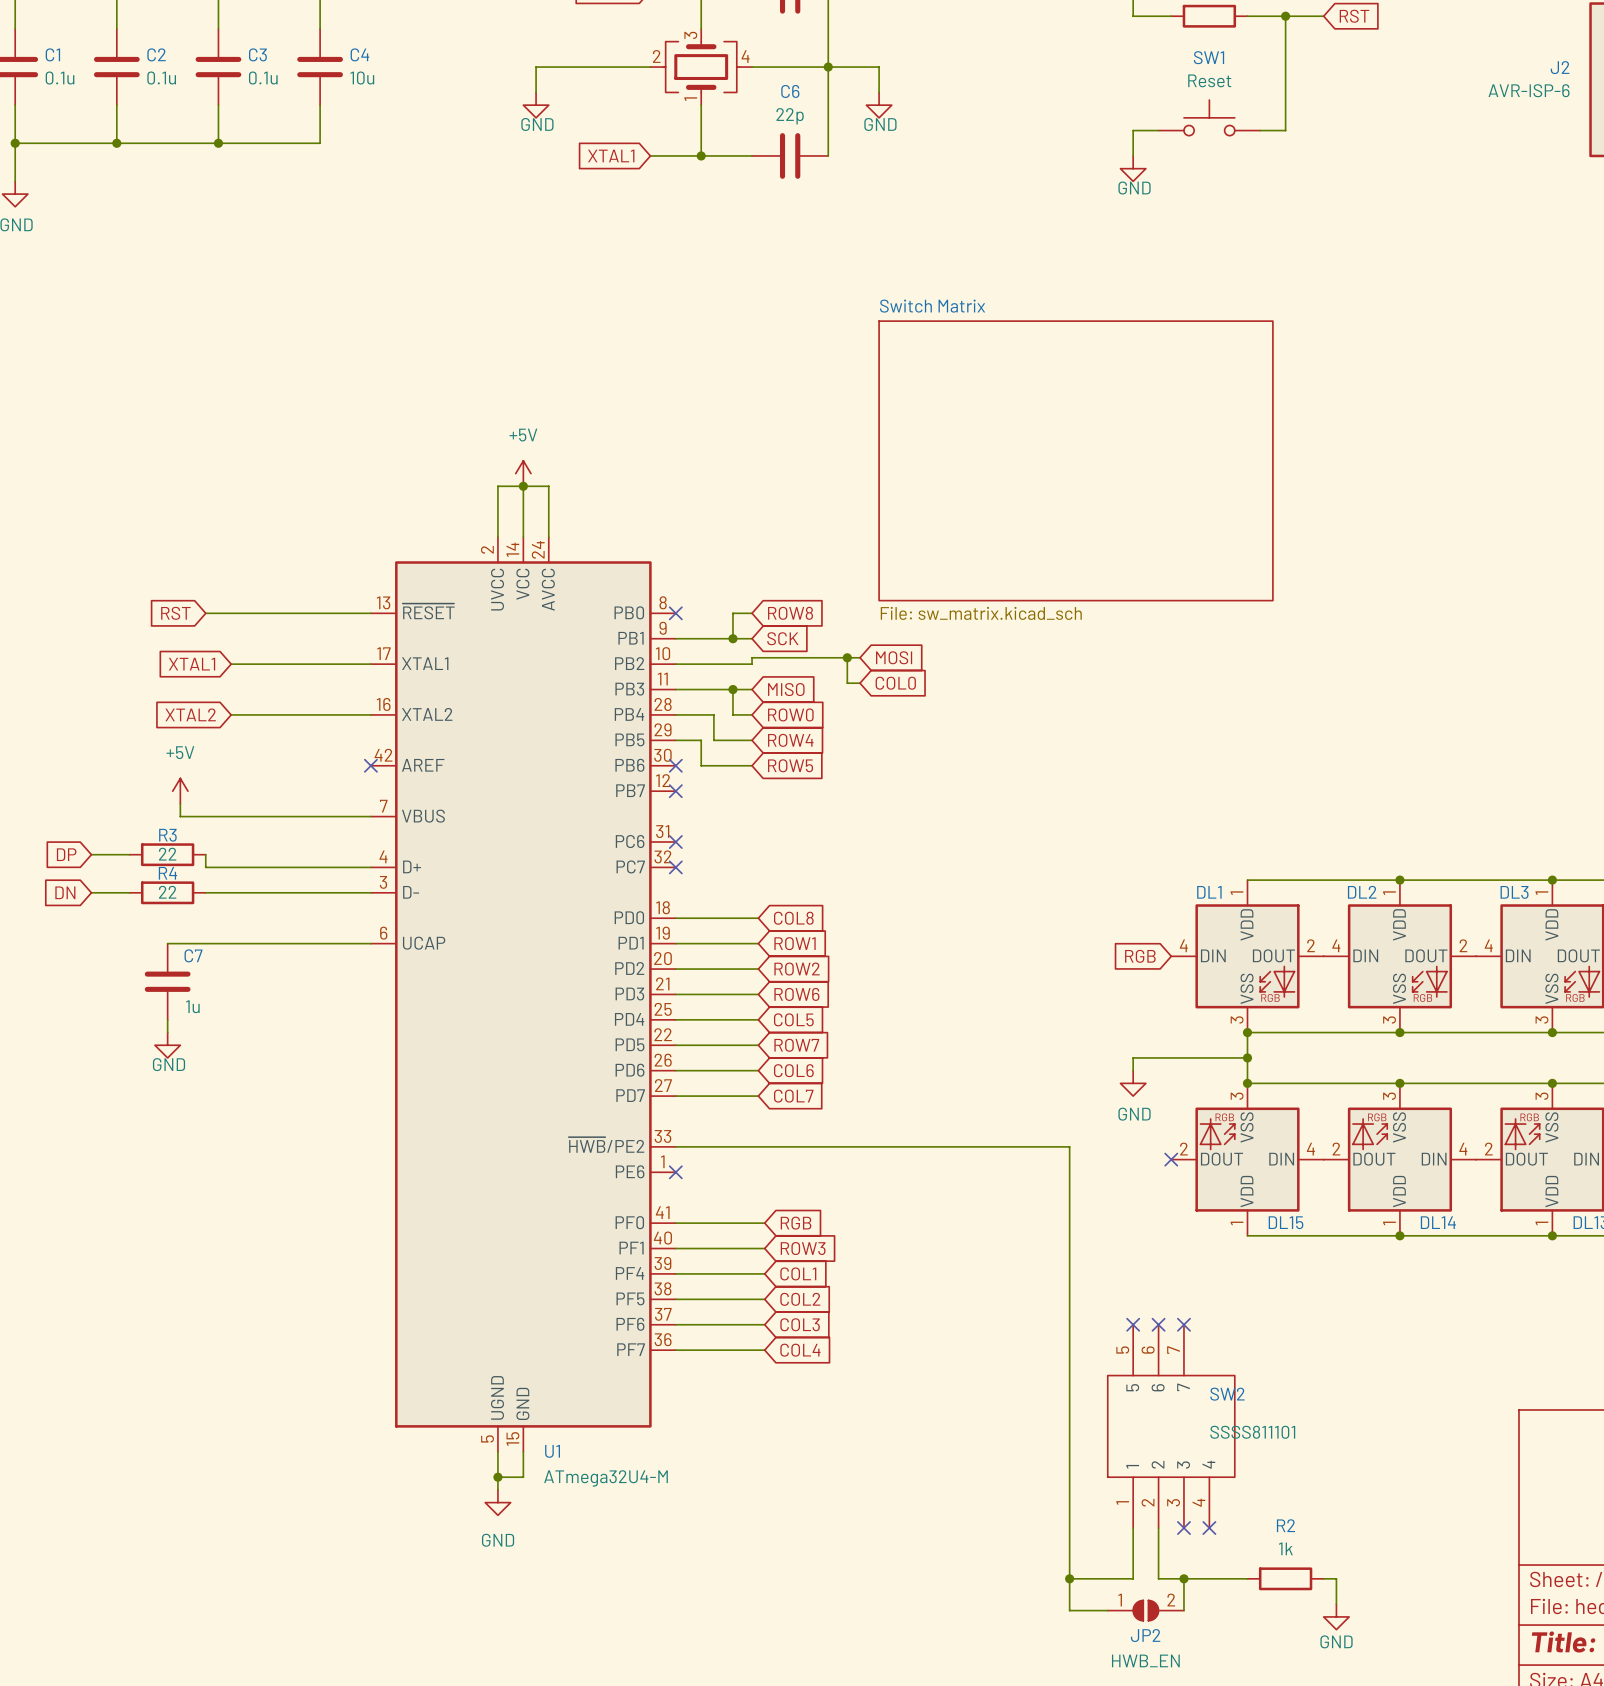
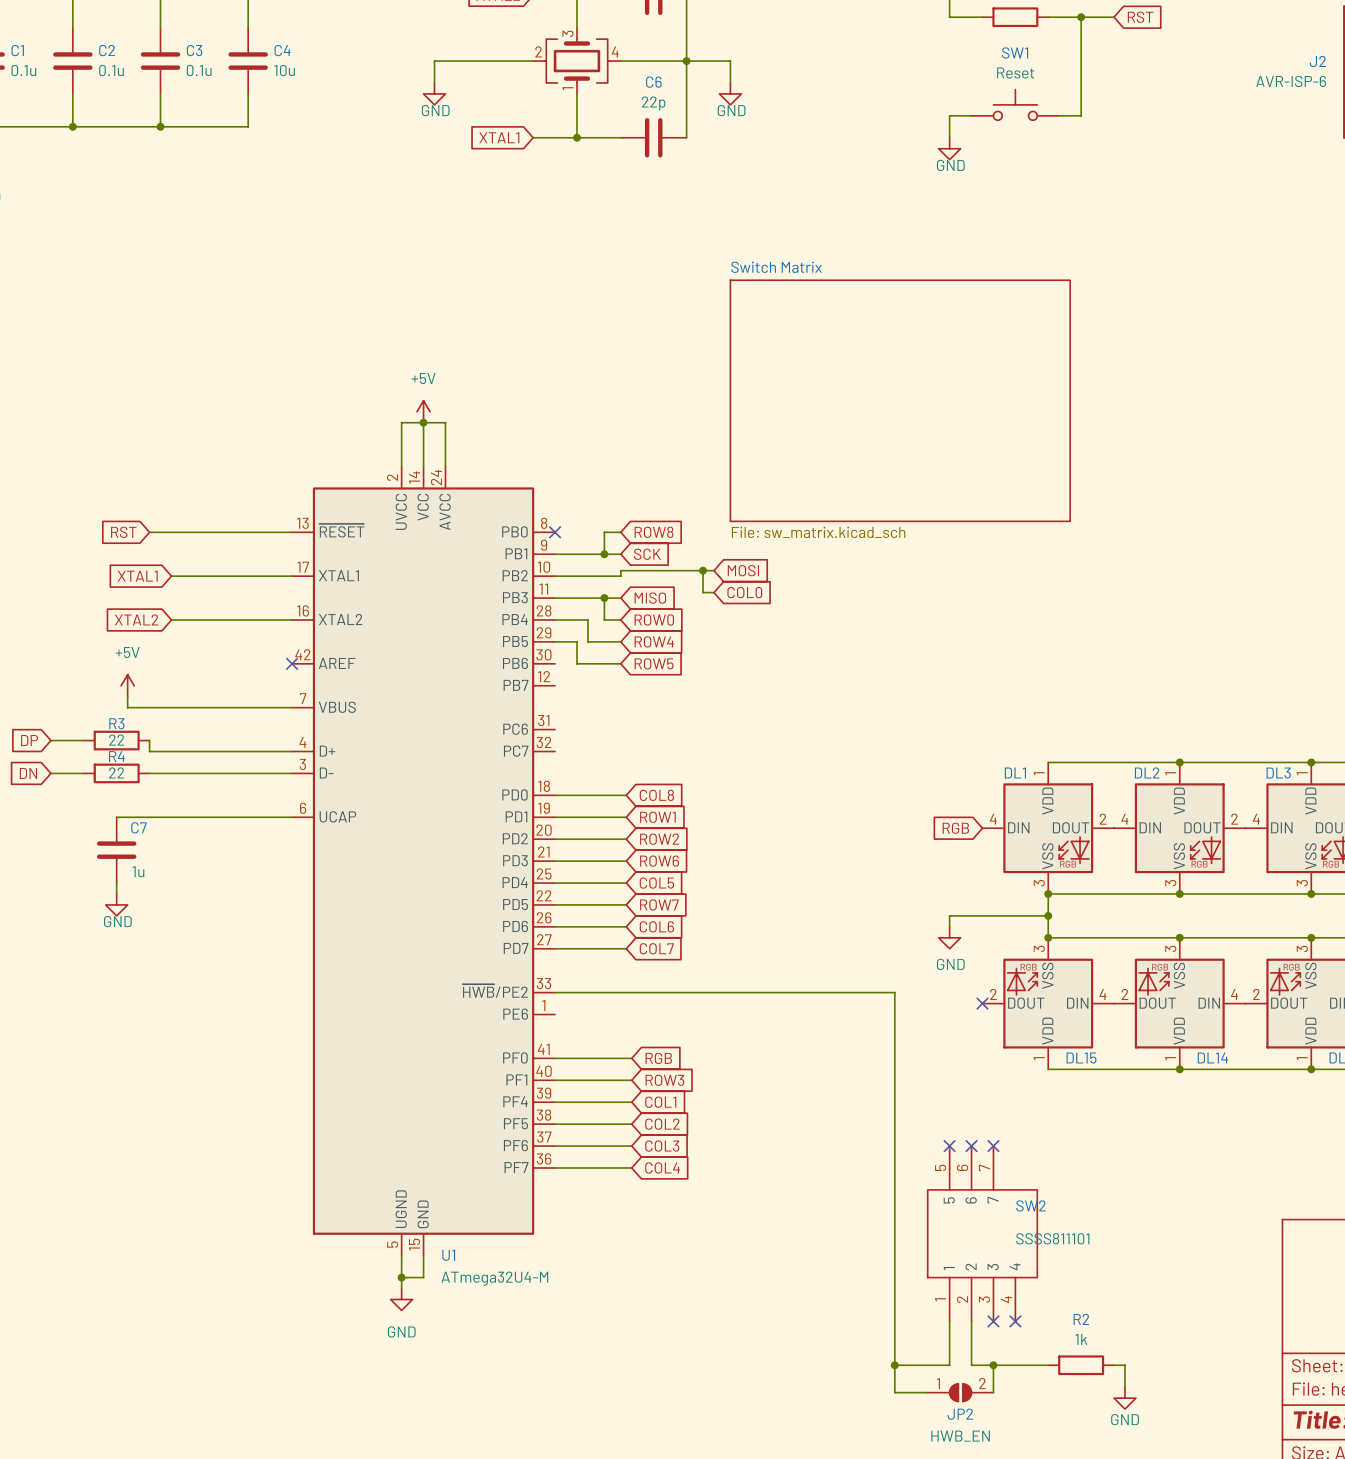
no-connect mark: (675, 765) -> none
no-connect mark: (675, 791) -> none
no-connect mark: (675, 841) -> none
no-connect mark: (675, 867) -> none
no-connect mark: (675, 1172) -> none

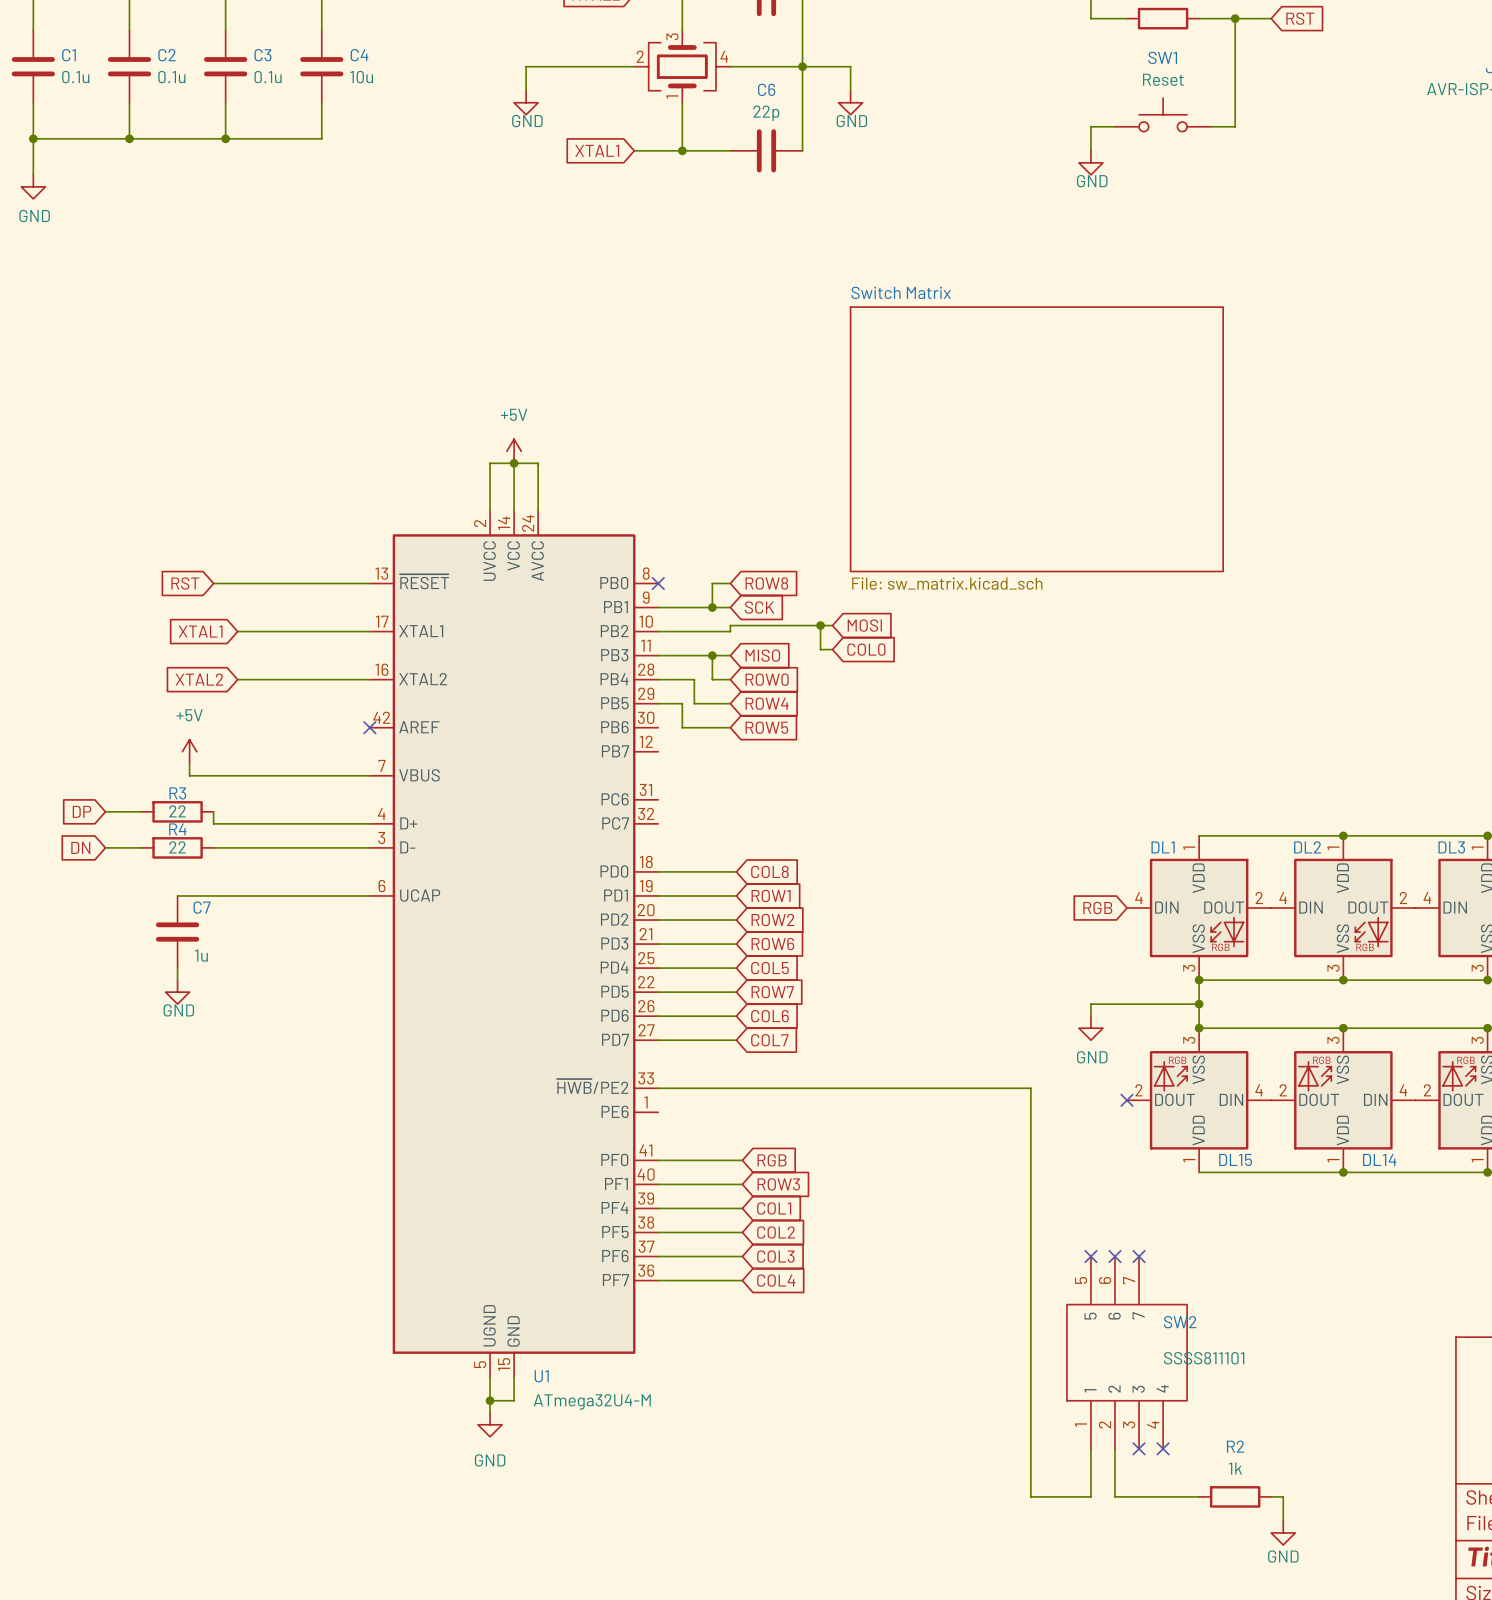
wire: (894, 1365) (894, 1392) (927, 1392) -> none
junction: (894, 1365) -> none
wire: (993, 1365) (993, 1392) -> none
junction: (993, 1365) -> none
JP2: HWB_EN (960, 1392) -> none

